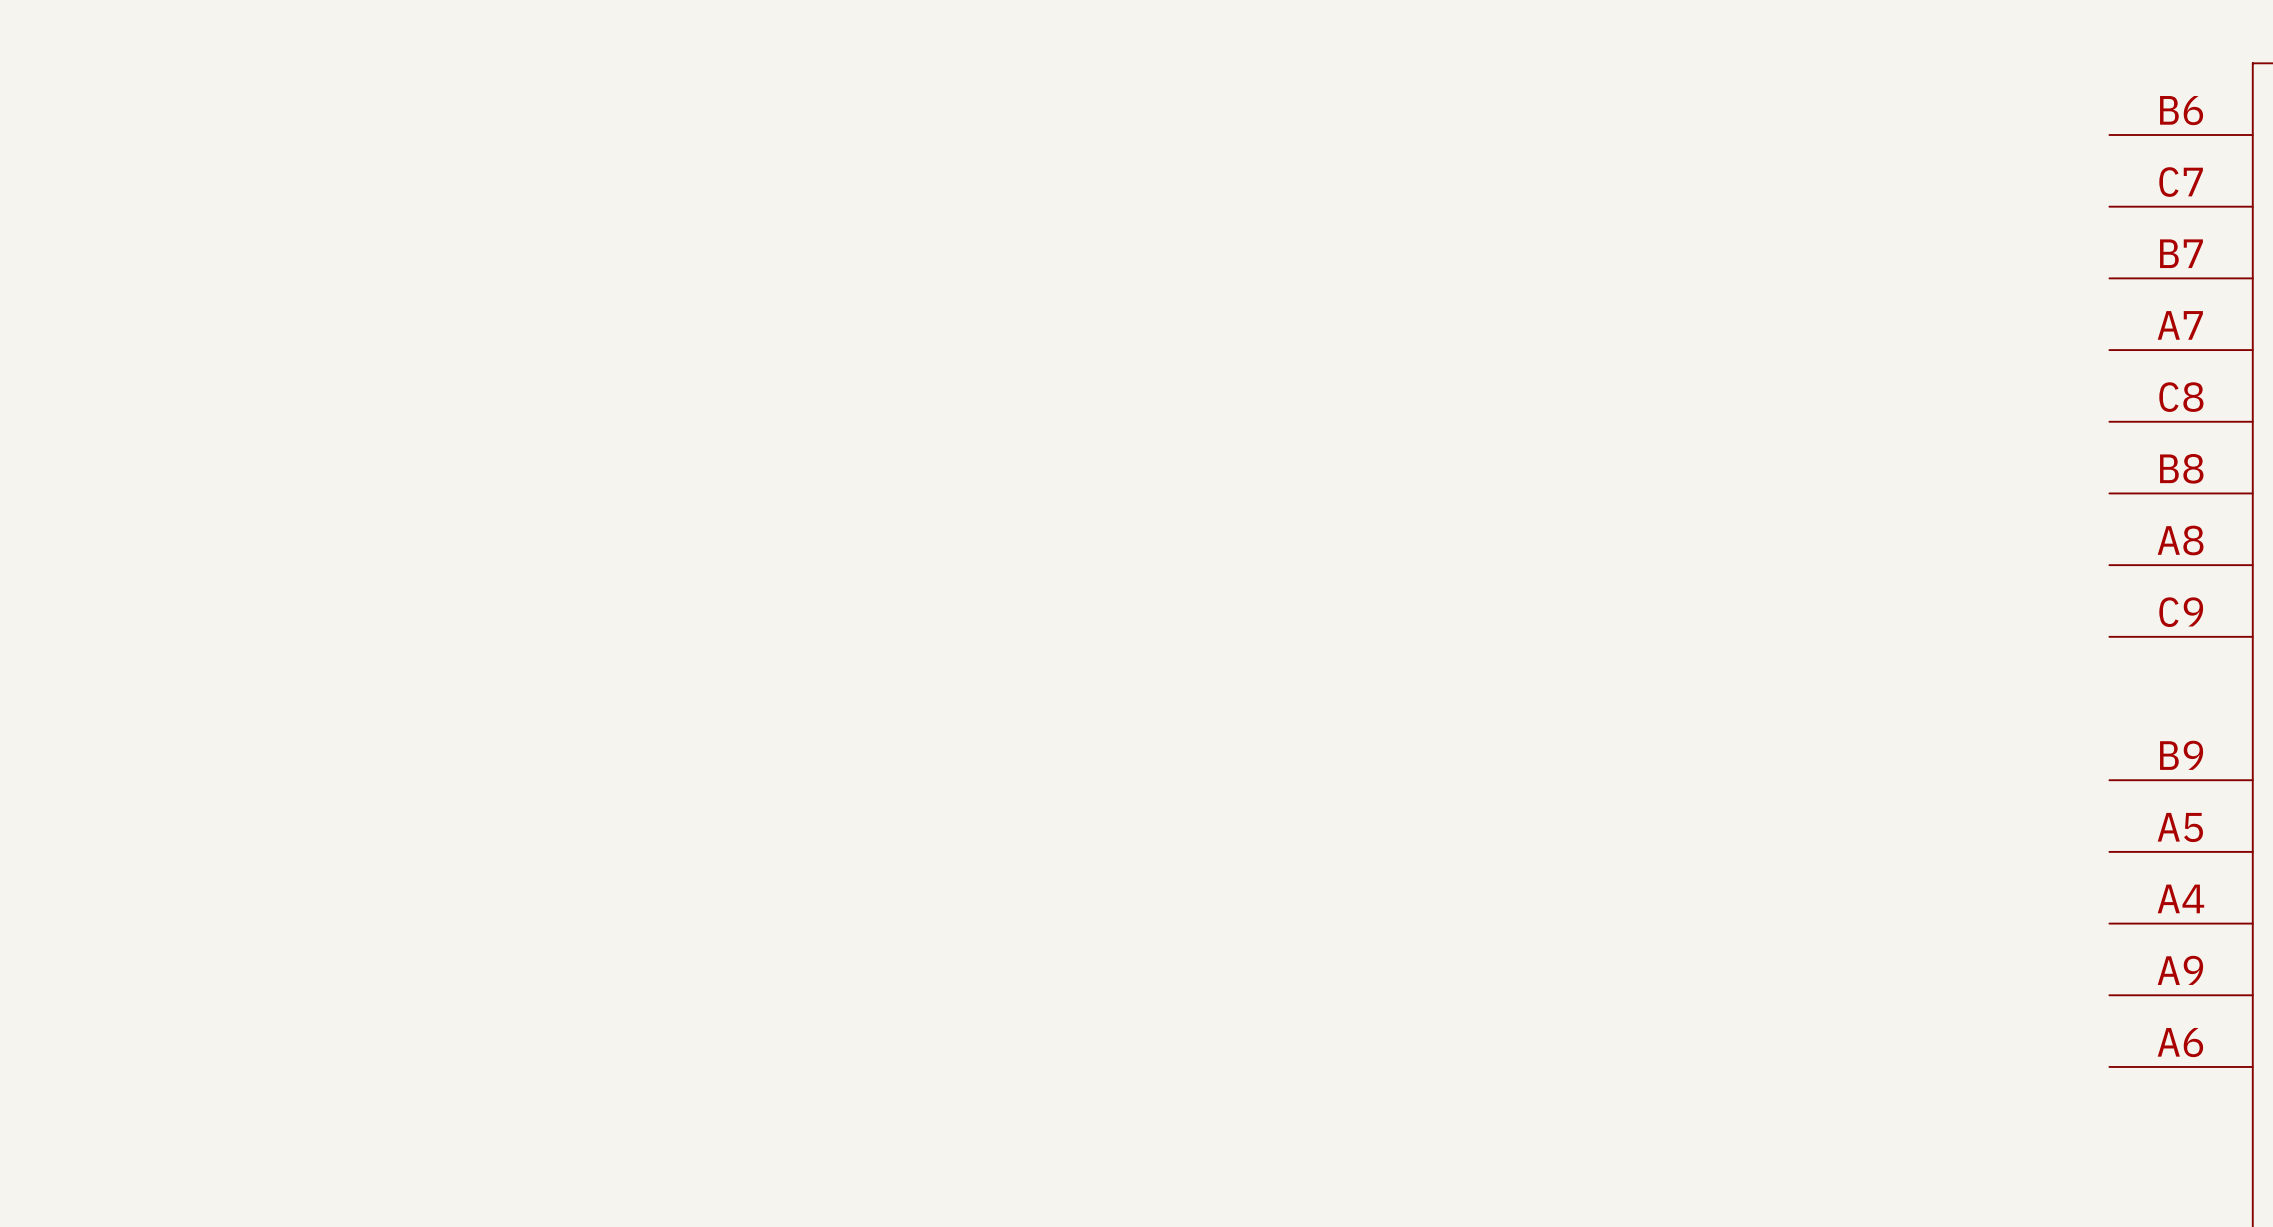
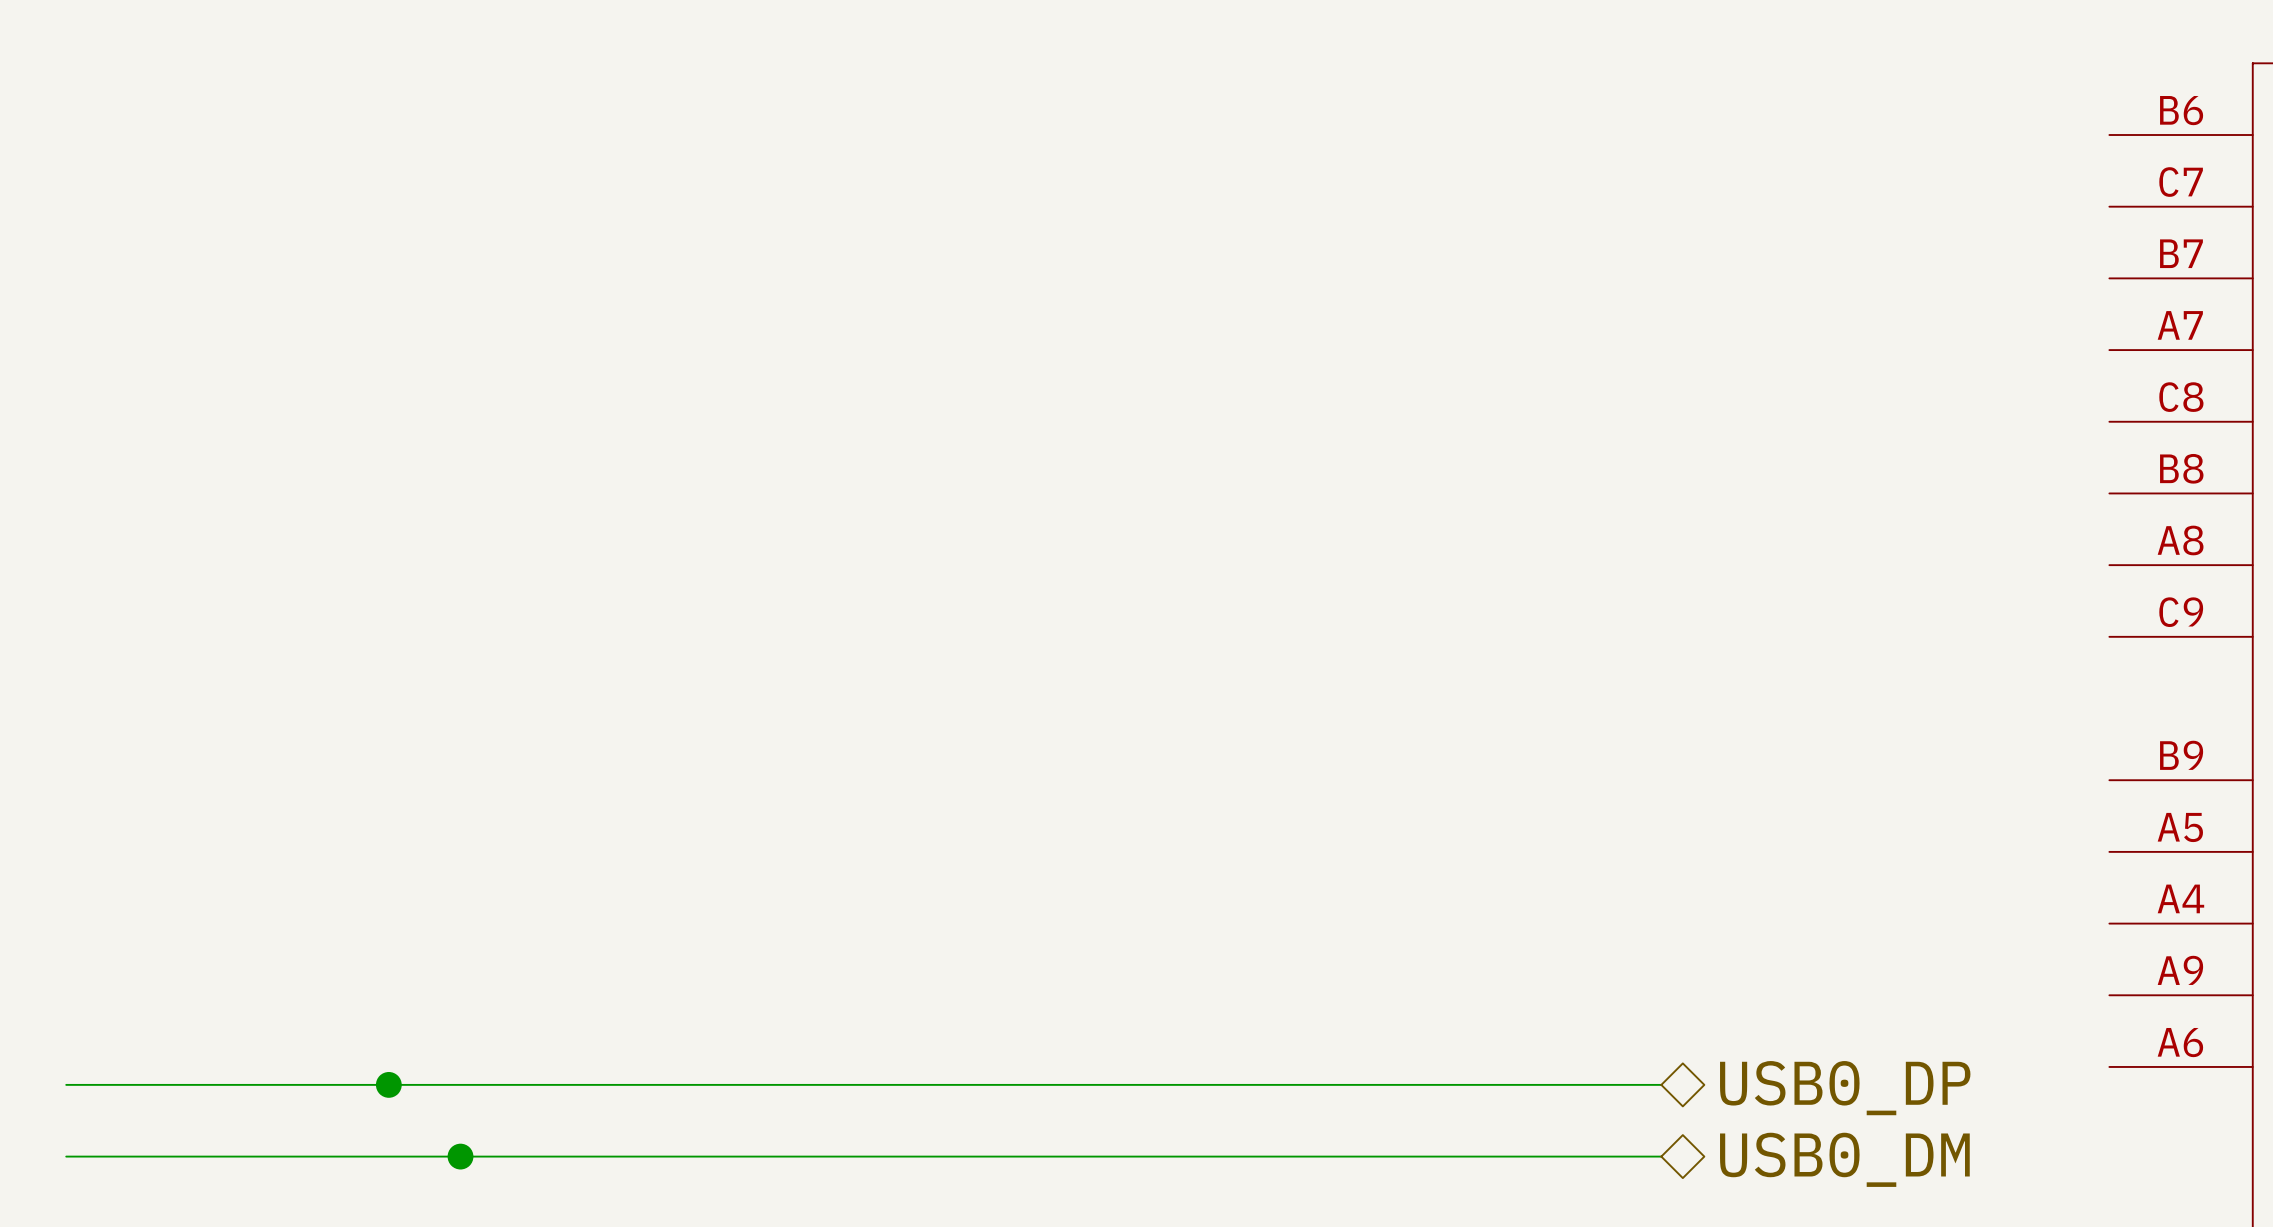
wire: none -> (66, 1084) (1661, 1084)
junction: none -> (388, 1084)
hierarchical label: none -> USB0_DP (1845, 1088)
wire: none -> (66, 1156) (1661, 1156)
junction: none -> (460, 1156)
hierarchical label: none -> USB0_DM (1844, 1159)

